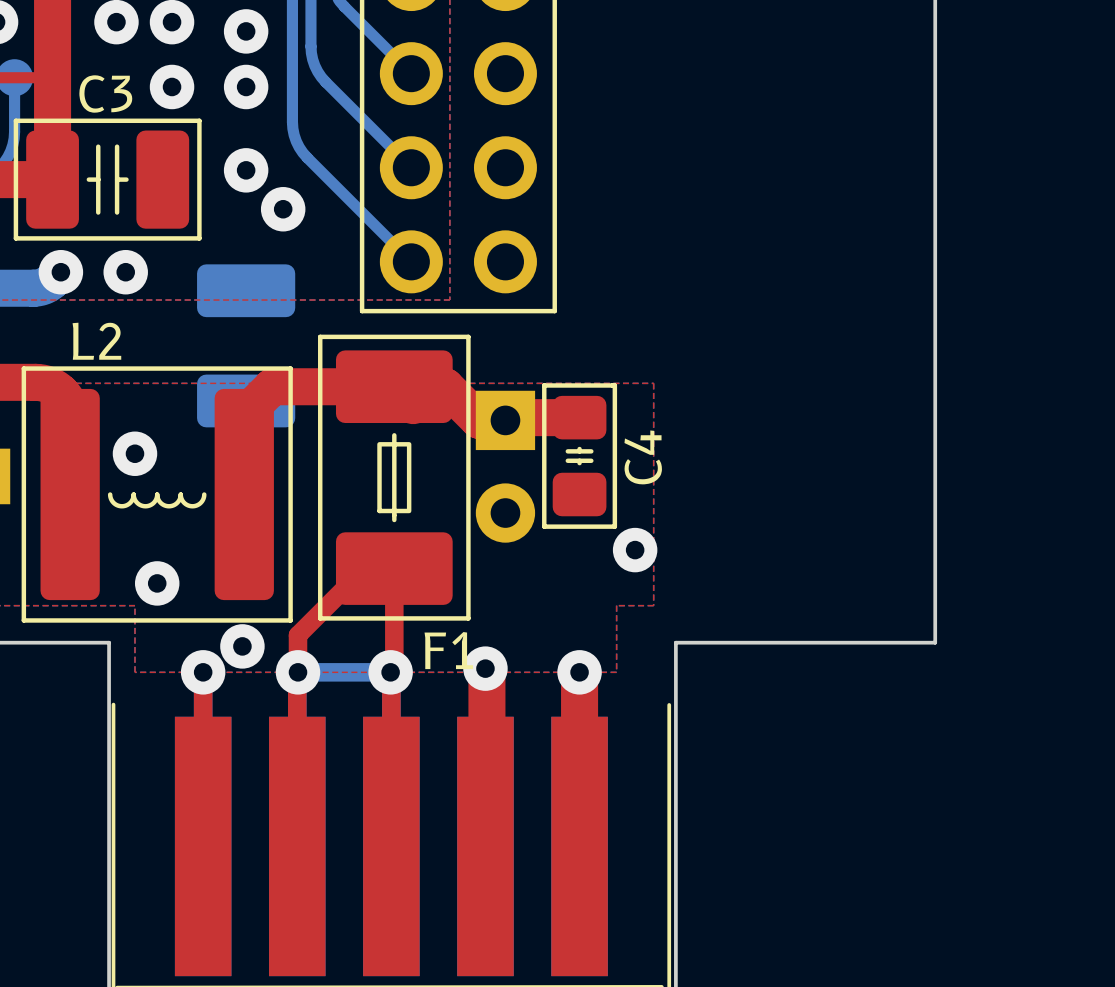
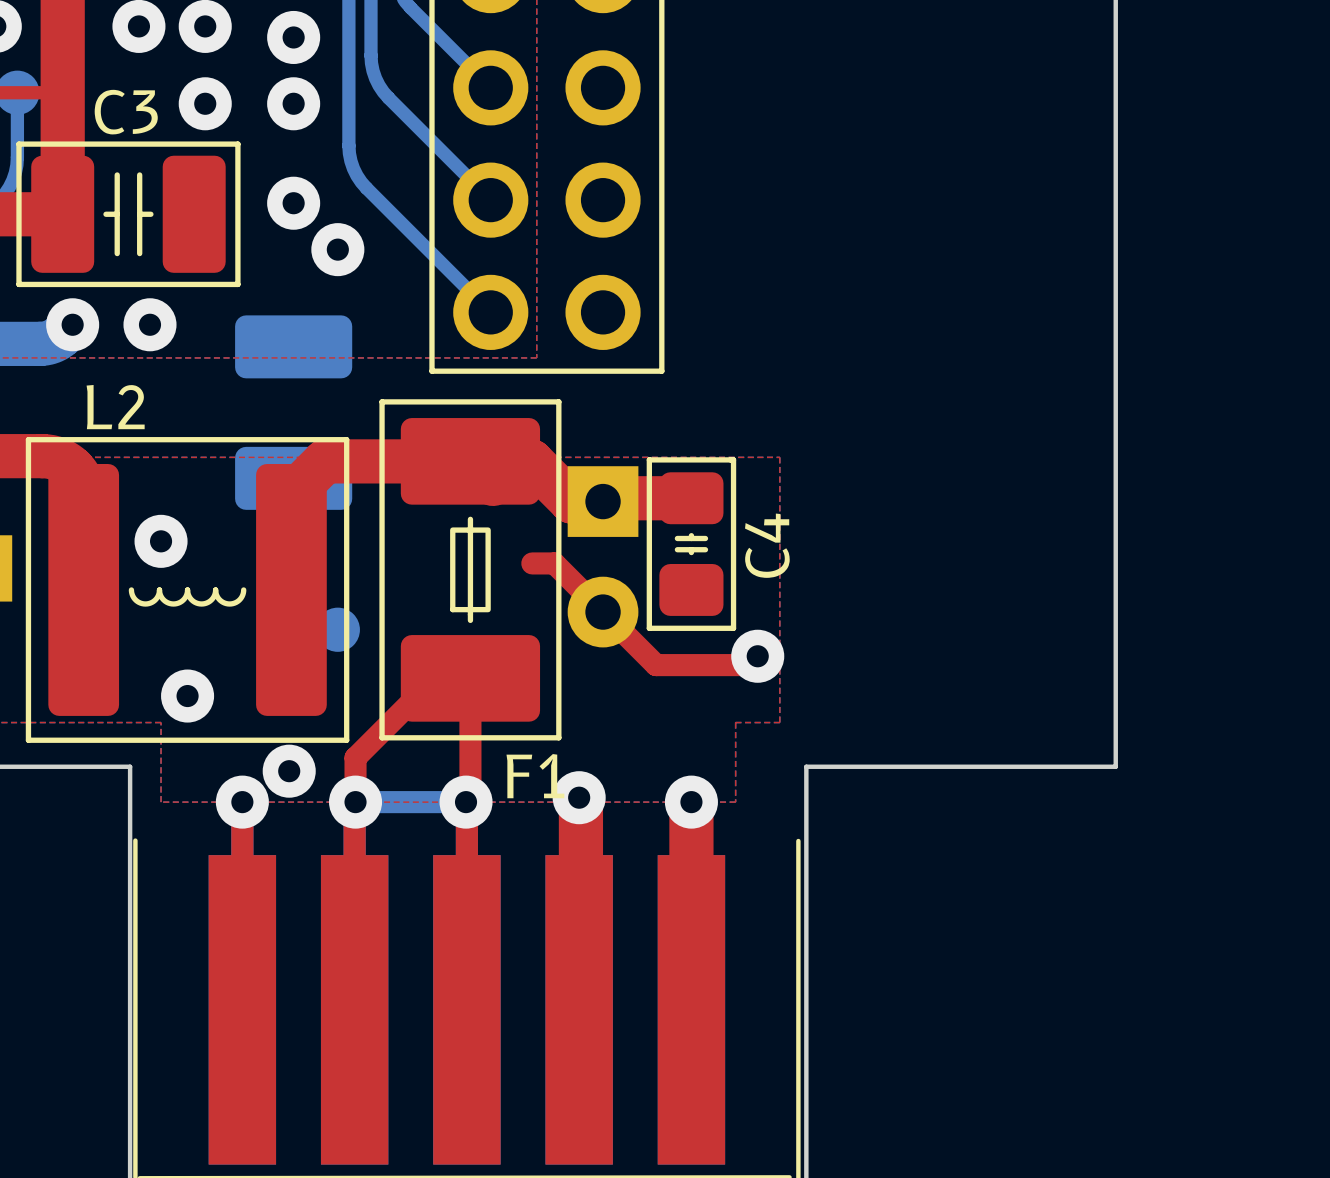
top track: none -> (532, 563) (554, 563) (656, 665) (748, 665) (757, 656)
part: none -> (337, 629)

